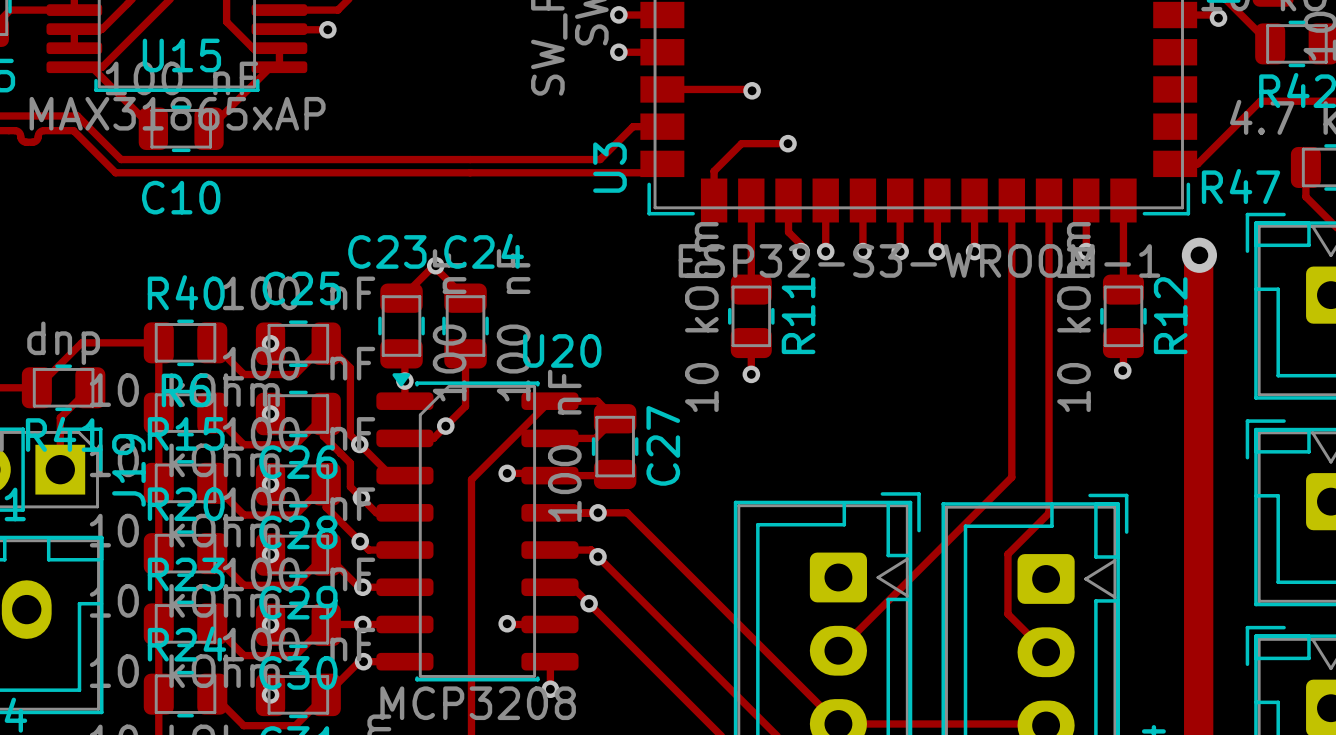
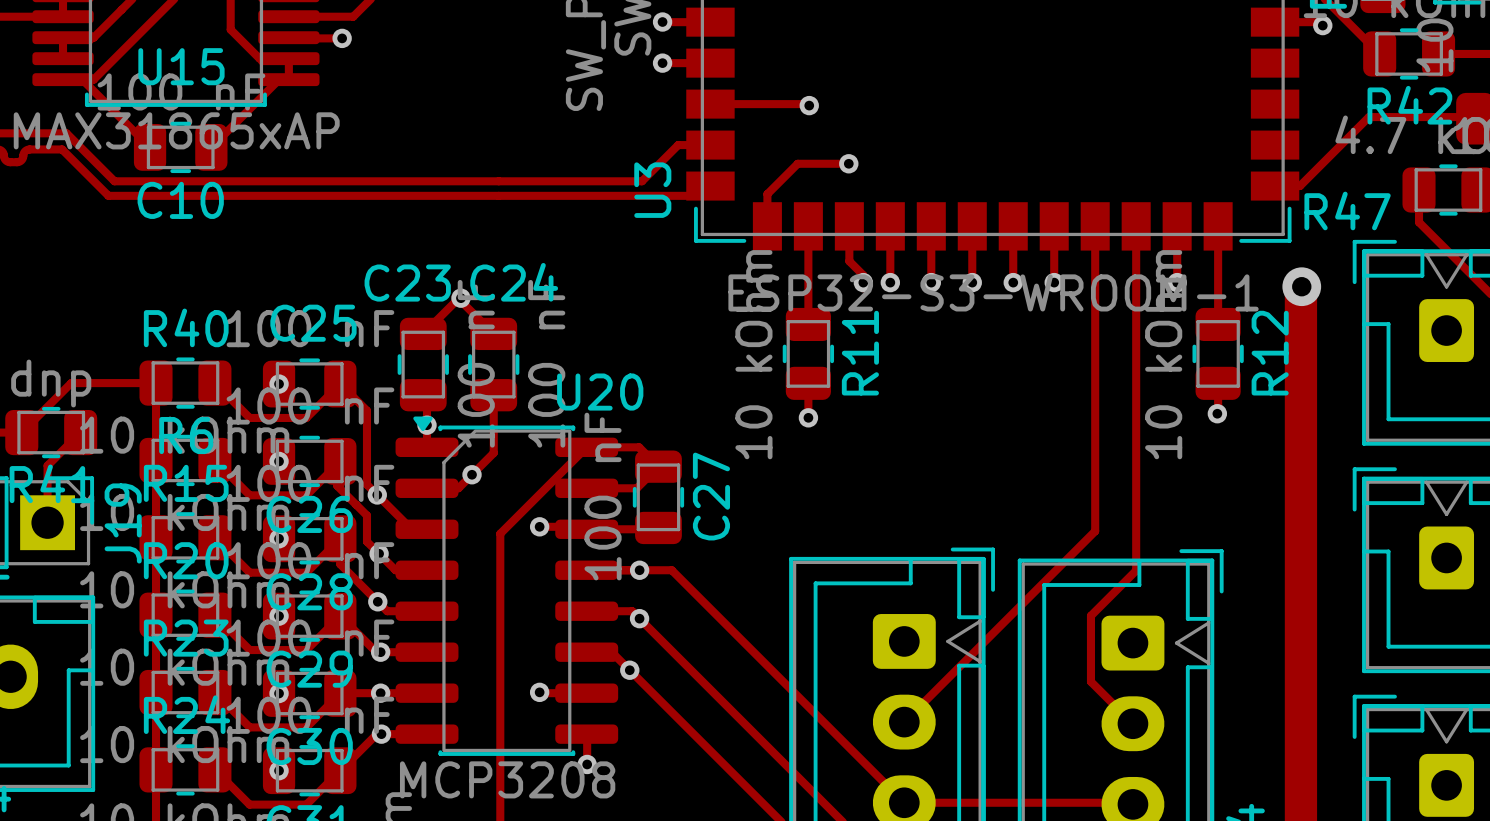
C10 name position: C10 (181, 197) -> C10 (180, 200)

